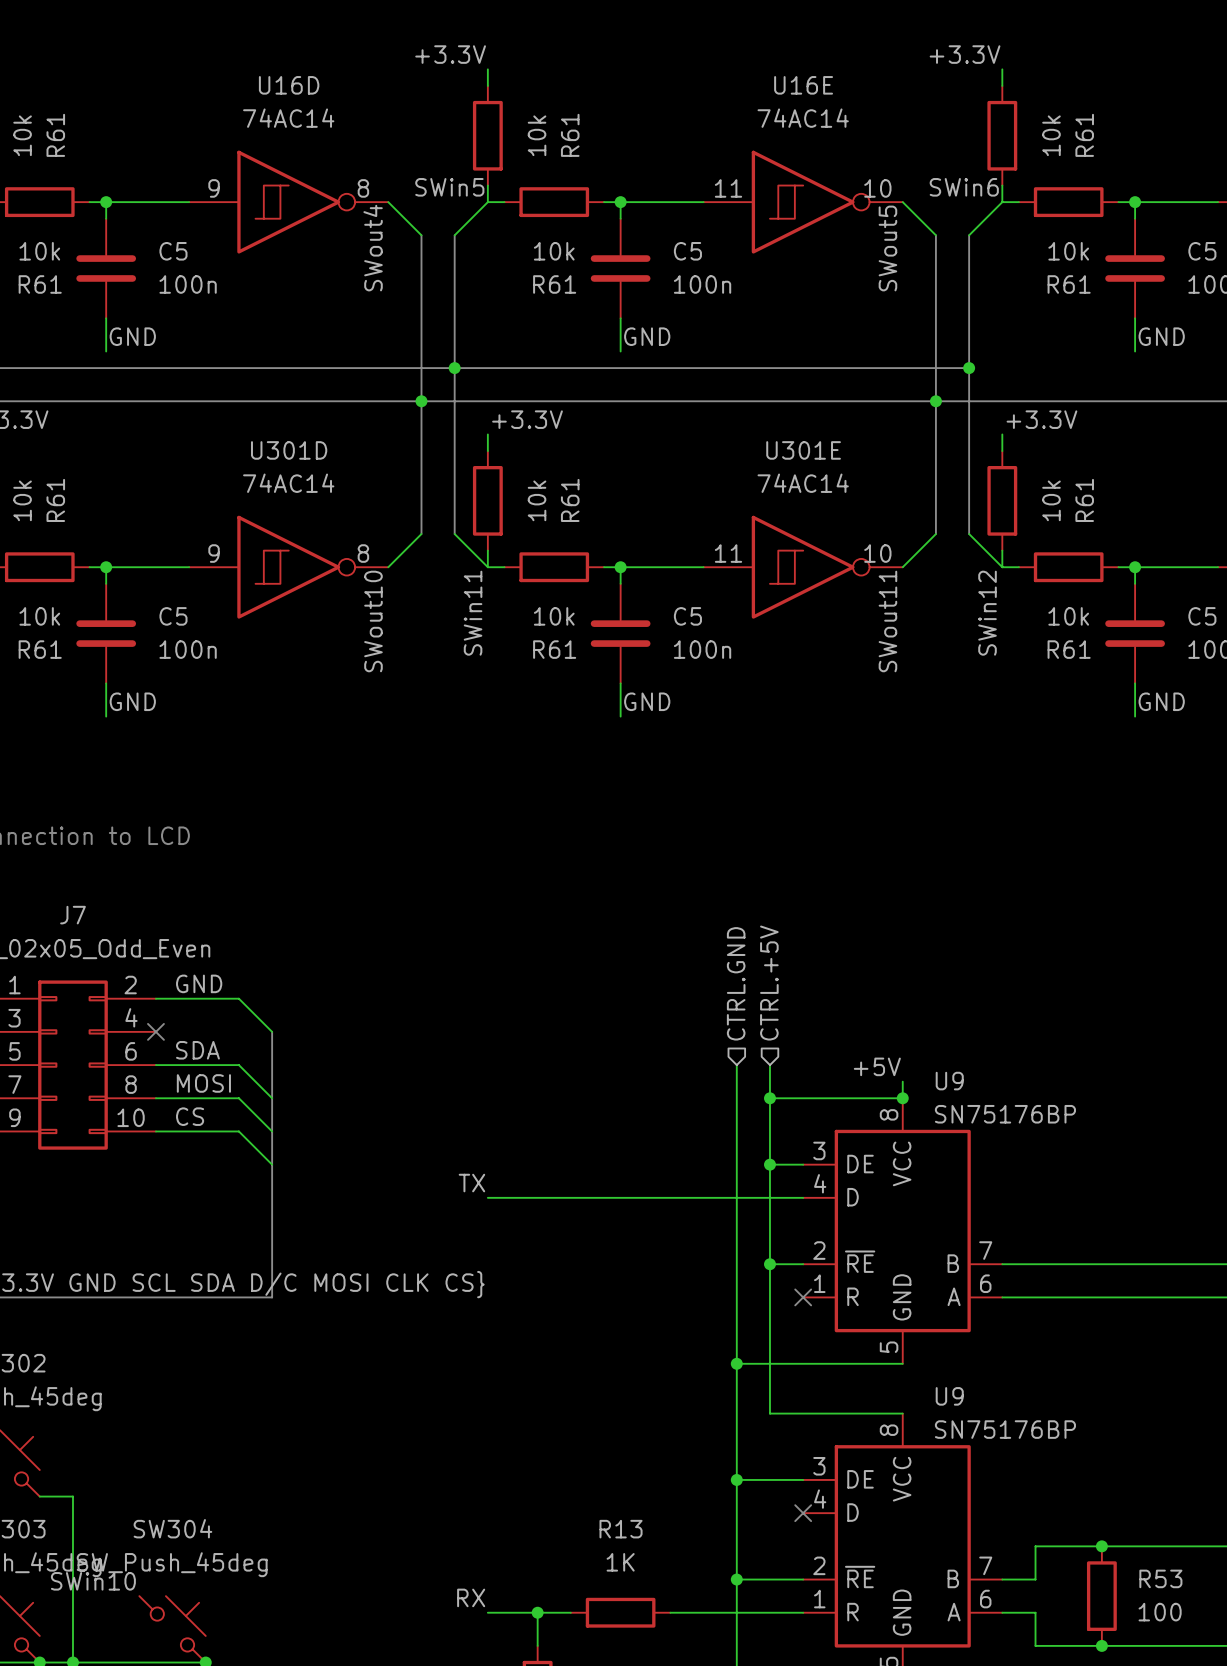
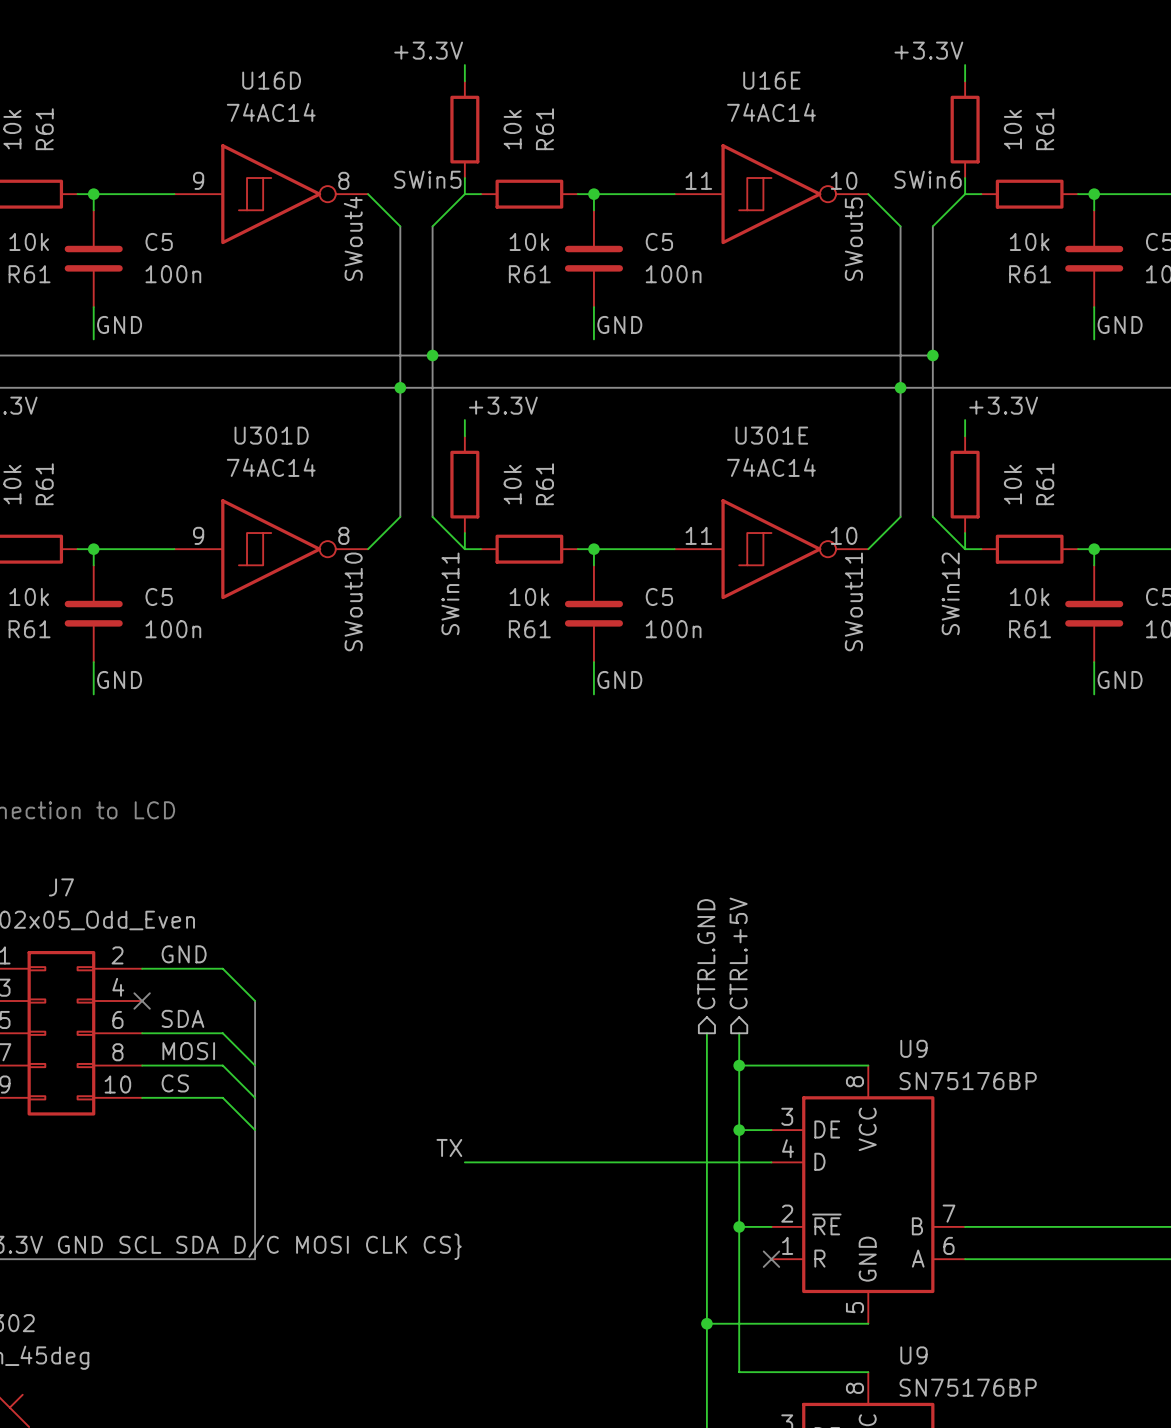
hierarchical label shape: input (736, 983) -> output (706, 954)
hierarchical label shape: input (769, 983) -> output (738, 953)
label: +5V (877, 1066) -> none
wire: (902, 1081) (902, 1098) -> none
junction: (902, 1098) -> none

